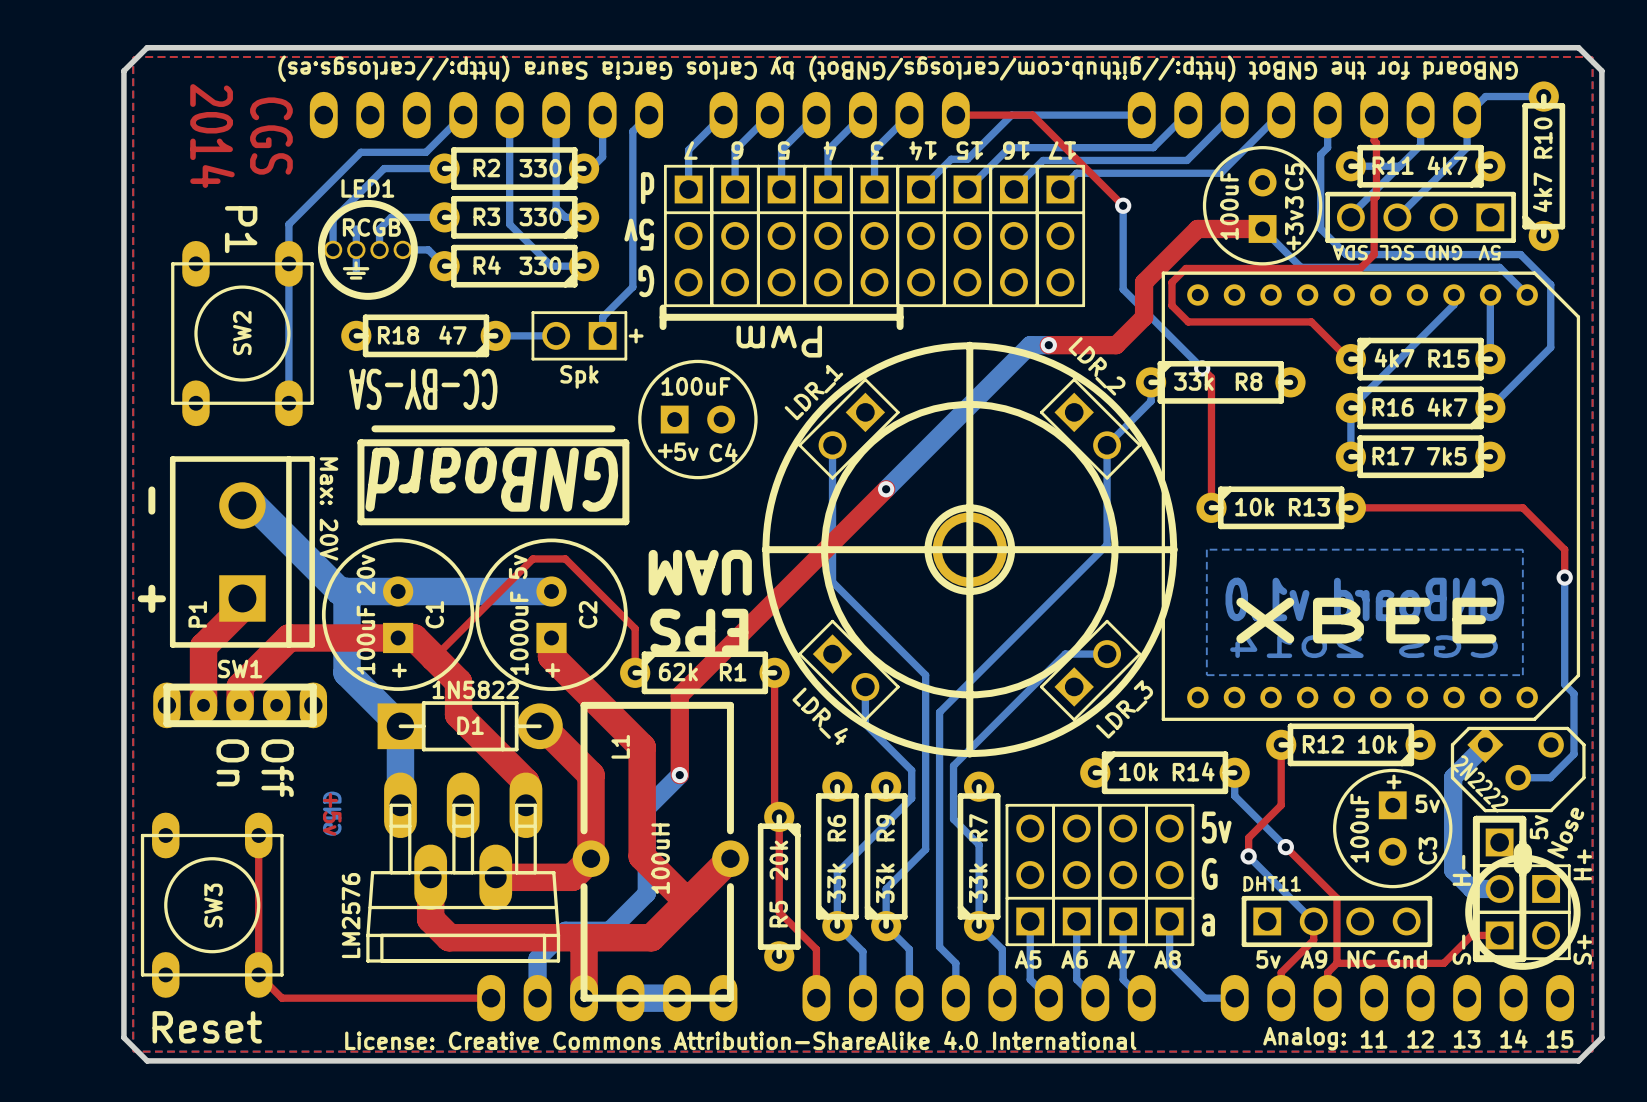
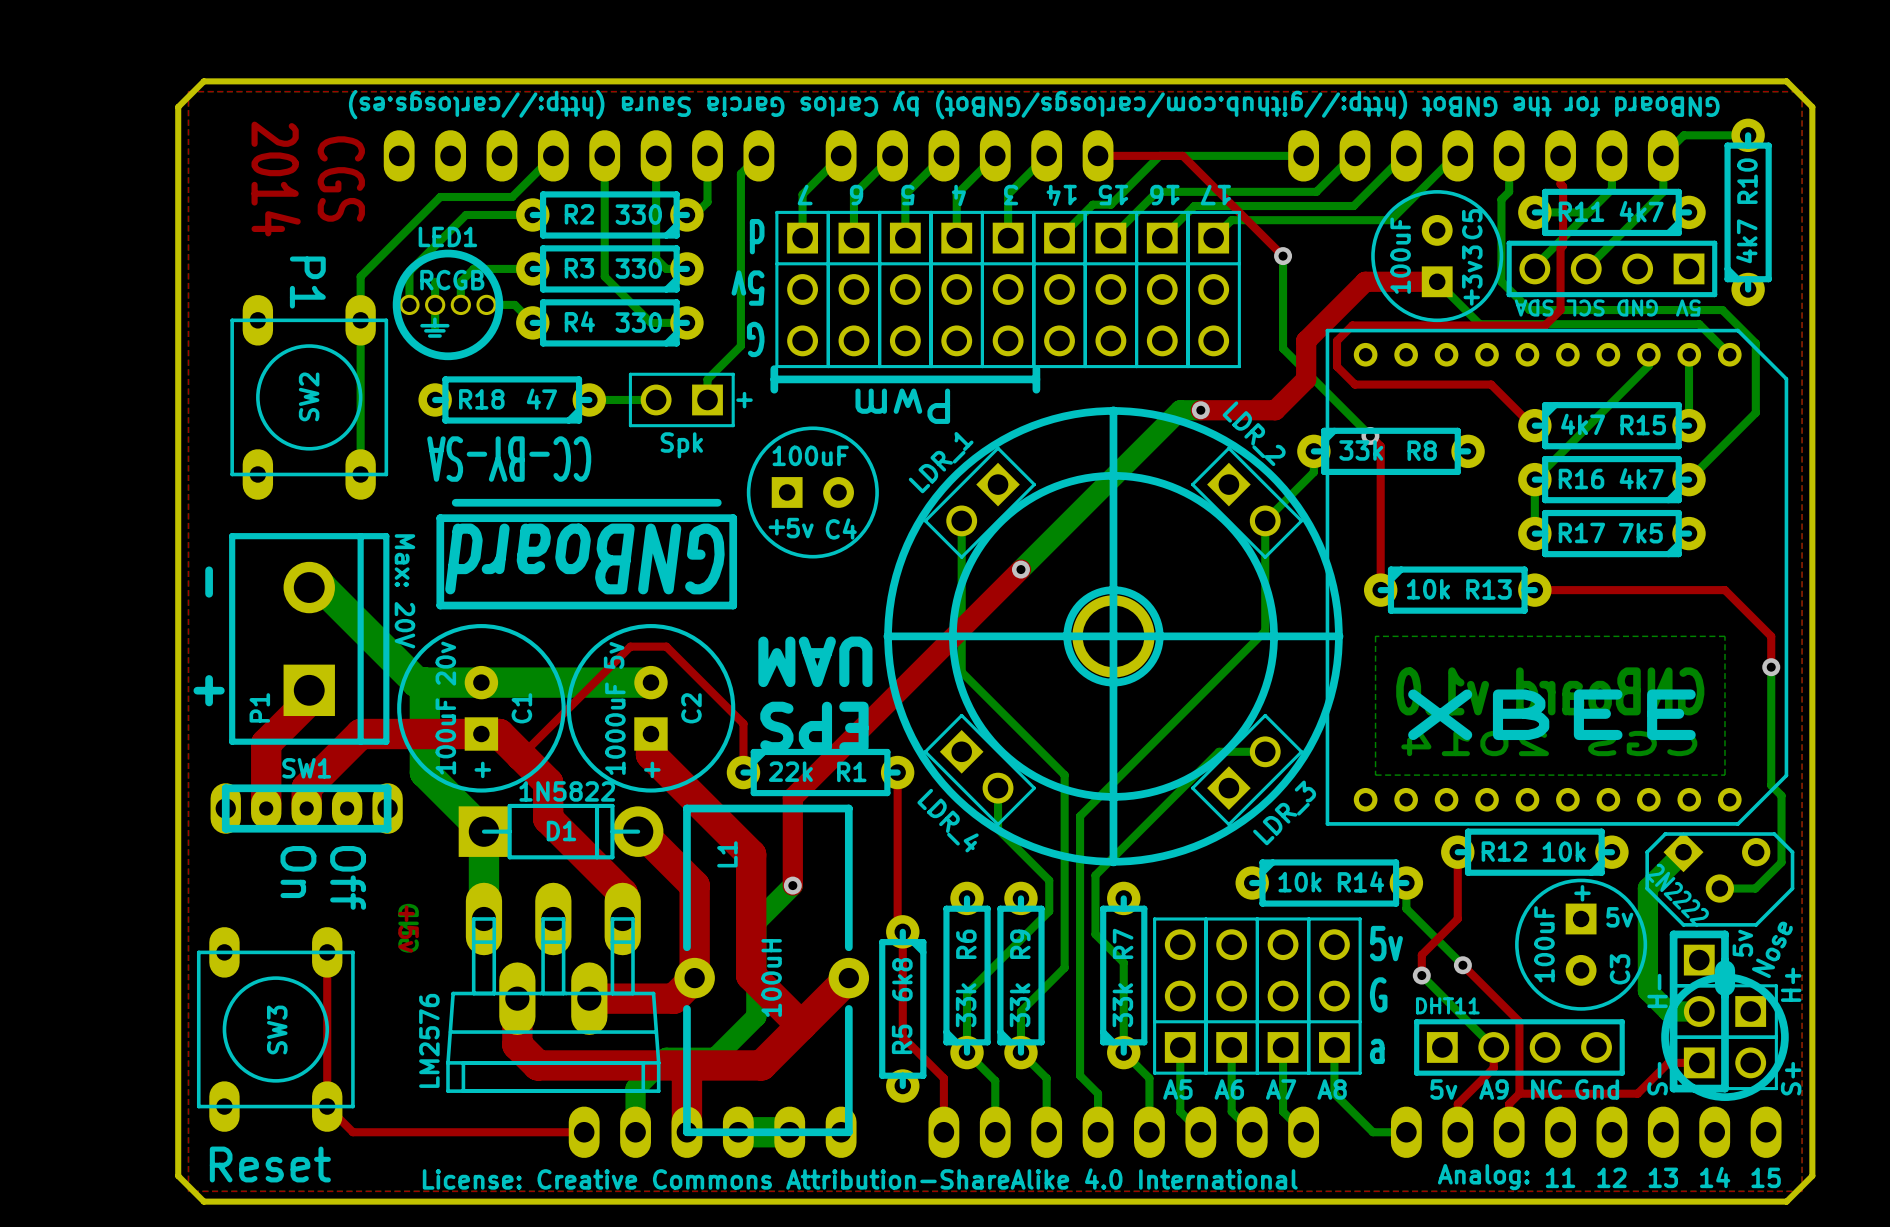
R1 value: 62k (678, 672) -> 22k (790, 771)
R5 value: 20k (778, 860) -> 6k8 (902, 979)

